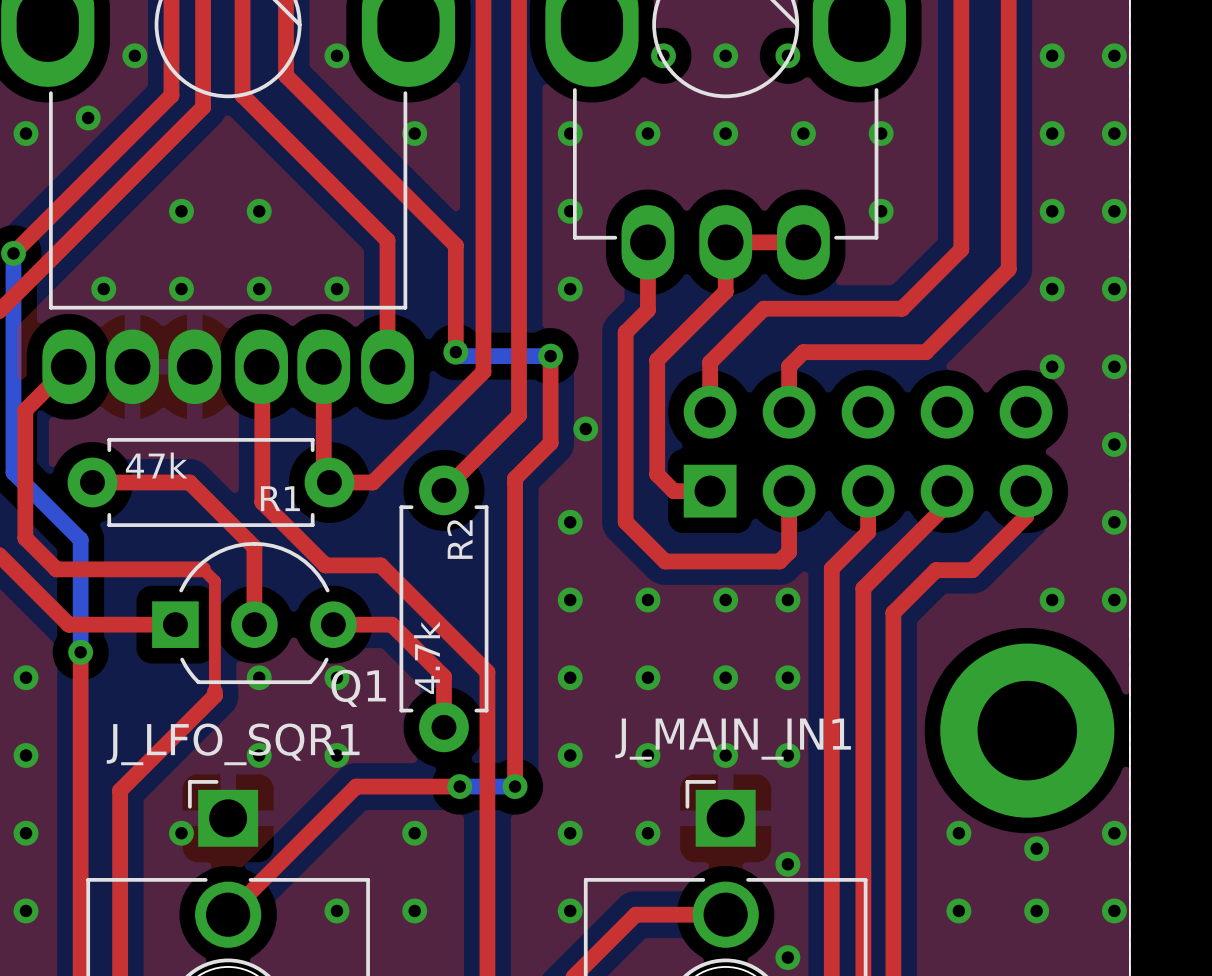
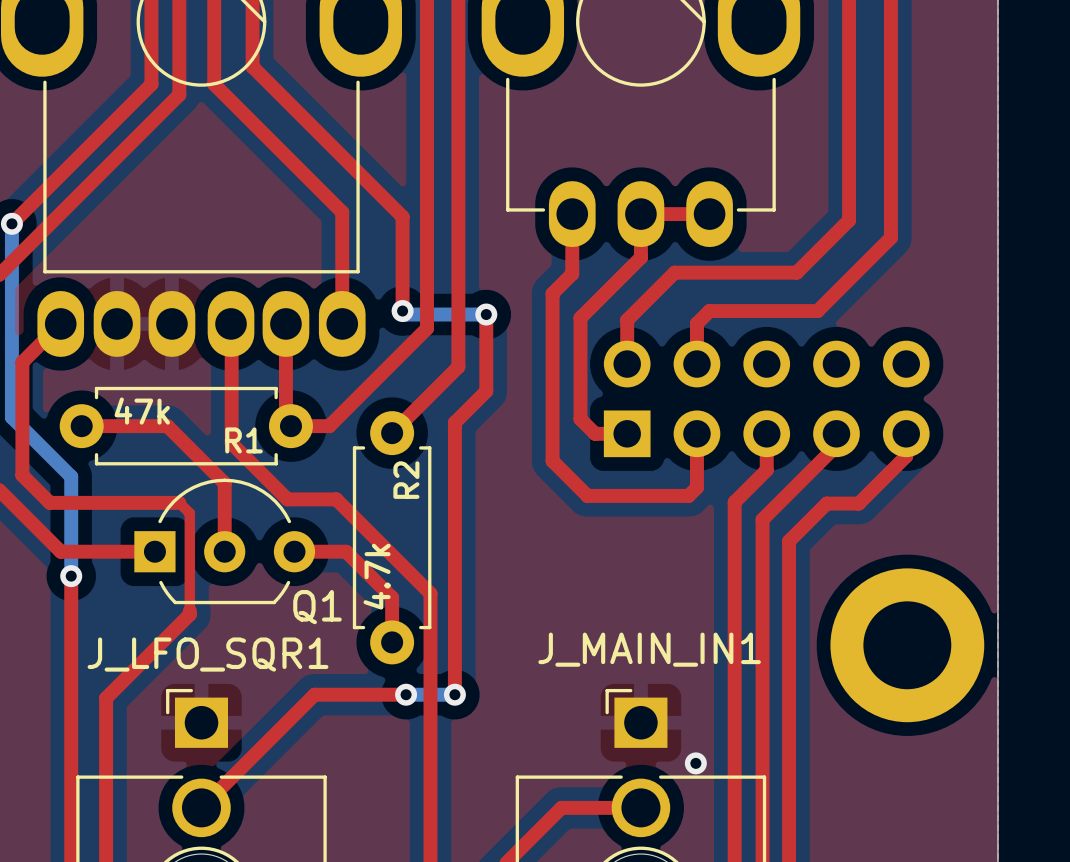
via: (134, 55) -> none
via: (336, 55) -> none
via: (663, 55) -> none
via: (725, 55) -> none
via: (787, 55) -> none
via: (1052, 55) -> none
via: (1114, 55) -> none
via: (88, 118) -> none
via: (26, 133) -> none
via: (414, 133) -> none
via: (570, 133) -> none
via: (647, 133) -> none
via: (725, 133) -> none
via: (803, 133) -> none
via: (881, 133) -> none
via: (1052, 133) -> none
via: (1114, 133) -> none
via: (181, 211) -> none
via: (259, 211) -> none
via: (570, 211) -> none
via: (881, 211) -> none
via: (1052, 211) -> none
via: (1114, 211) -> none
via: (103, 289) -> none
via: (181, 289) -> none
via: (259, 289) -> none
via: (336, 289) -> none
via: (570, 289) -> none
via: (1052, 289) -> none
via: (1114, 289) -> none
via: (1052, 366) -> none
via: (1114, 366) -> none
via: (585, 428) -> none
via: (1114, 444) -> none
via: (570, 522) -> none
via: (1114, 522) -> none
via: (570, 600) -> none
via: (647, 600) -> none
via: (725, 600) -> none
via: (787, 600) -> none
via: (1052, 600) -> none
via: (1114, 600) -> none
via: (26, 677) -> none
via: (259, 677) -> none
via: (336, 677) -> none
via: (570, 677) -> none
via: (647, 677) -> none
via: (725, 677) -> none
via: (787, 677) -> none
via: (26, 755) -> none
via: (259, 755) -> none
via: (336, 755) -> none
via: (570, 755) -> none
via: (647, 755) -> none
via: (725, 755) -> none
via: (787, 755) -> none
via: (26, 833) -> none
via: (181, 833) -> none
via: (414, 833) -> none
via: (570, 833) -> none
via: (647, 833) -> none
via: (958, 833) -> none
via: (1114, 833) -> none
via: (1036, 848) -> none
via: (26, 910) -> none
via: (336, 910) -> none
via: (414, 910) -> none
via: (570, 910) -> none
via: (958, 910) -> none
via: (1036, 910) -> none
via: (1114, 910) -> none
via: (787, 957) -> none

